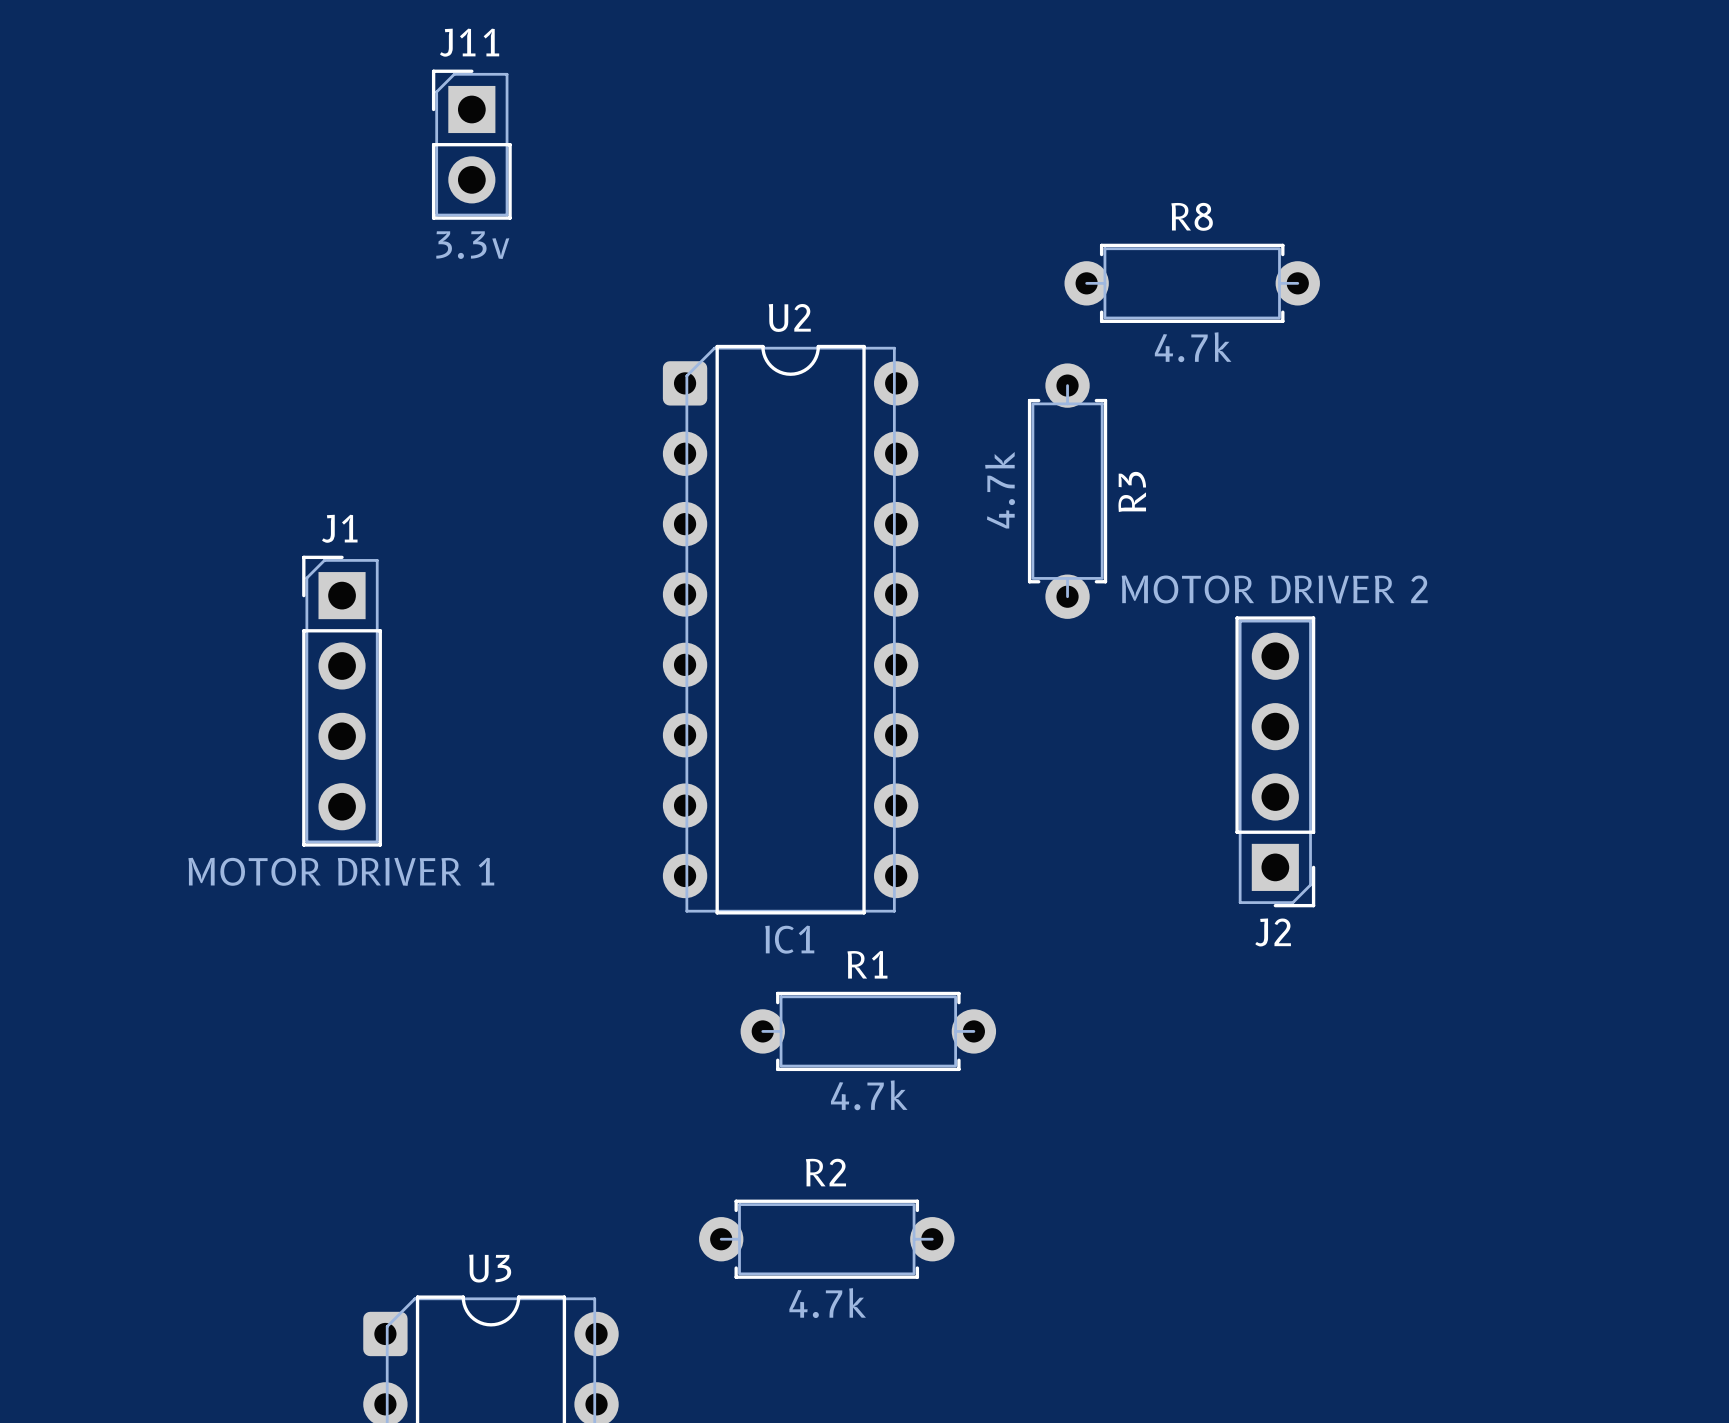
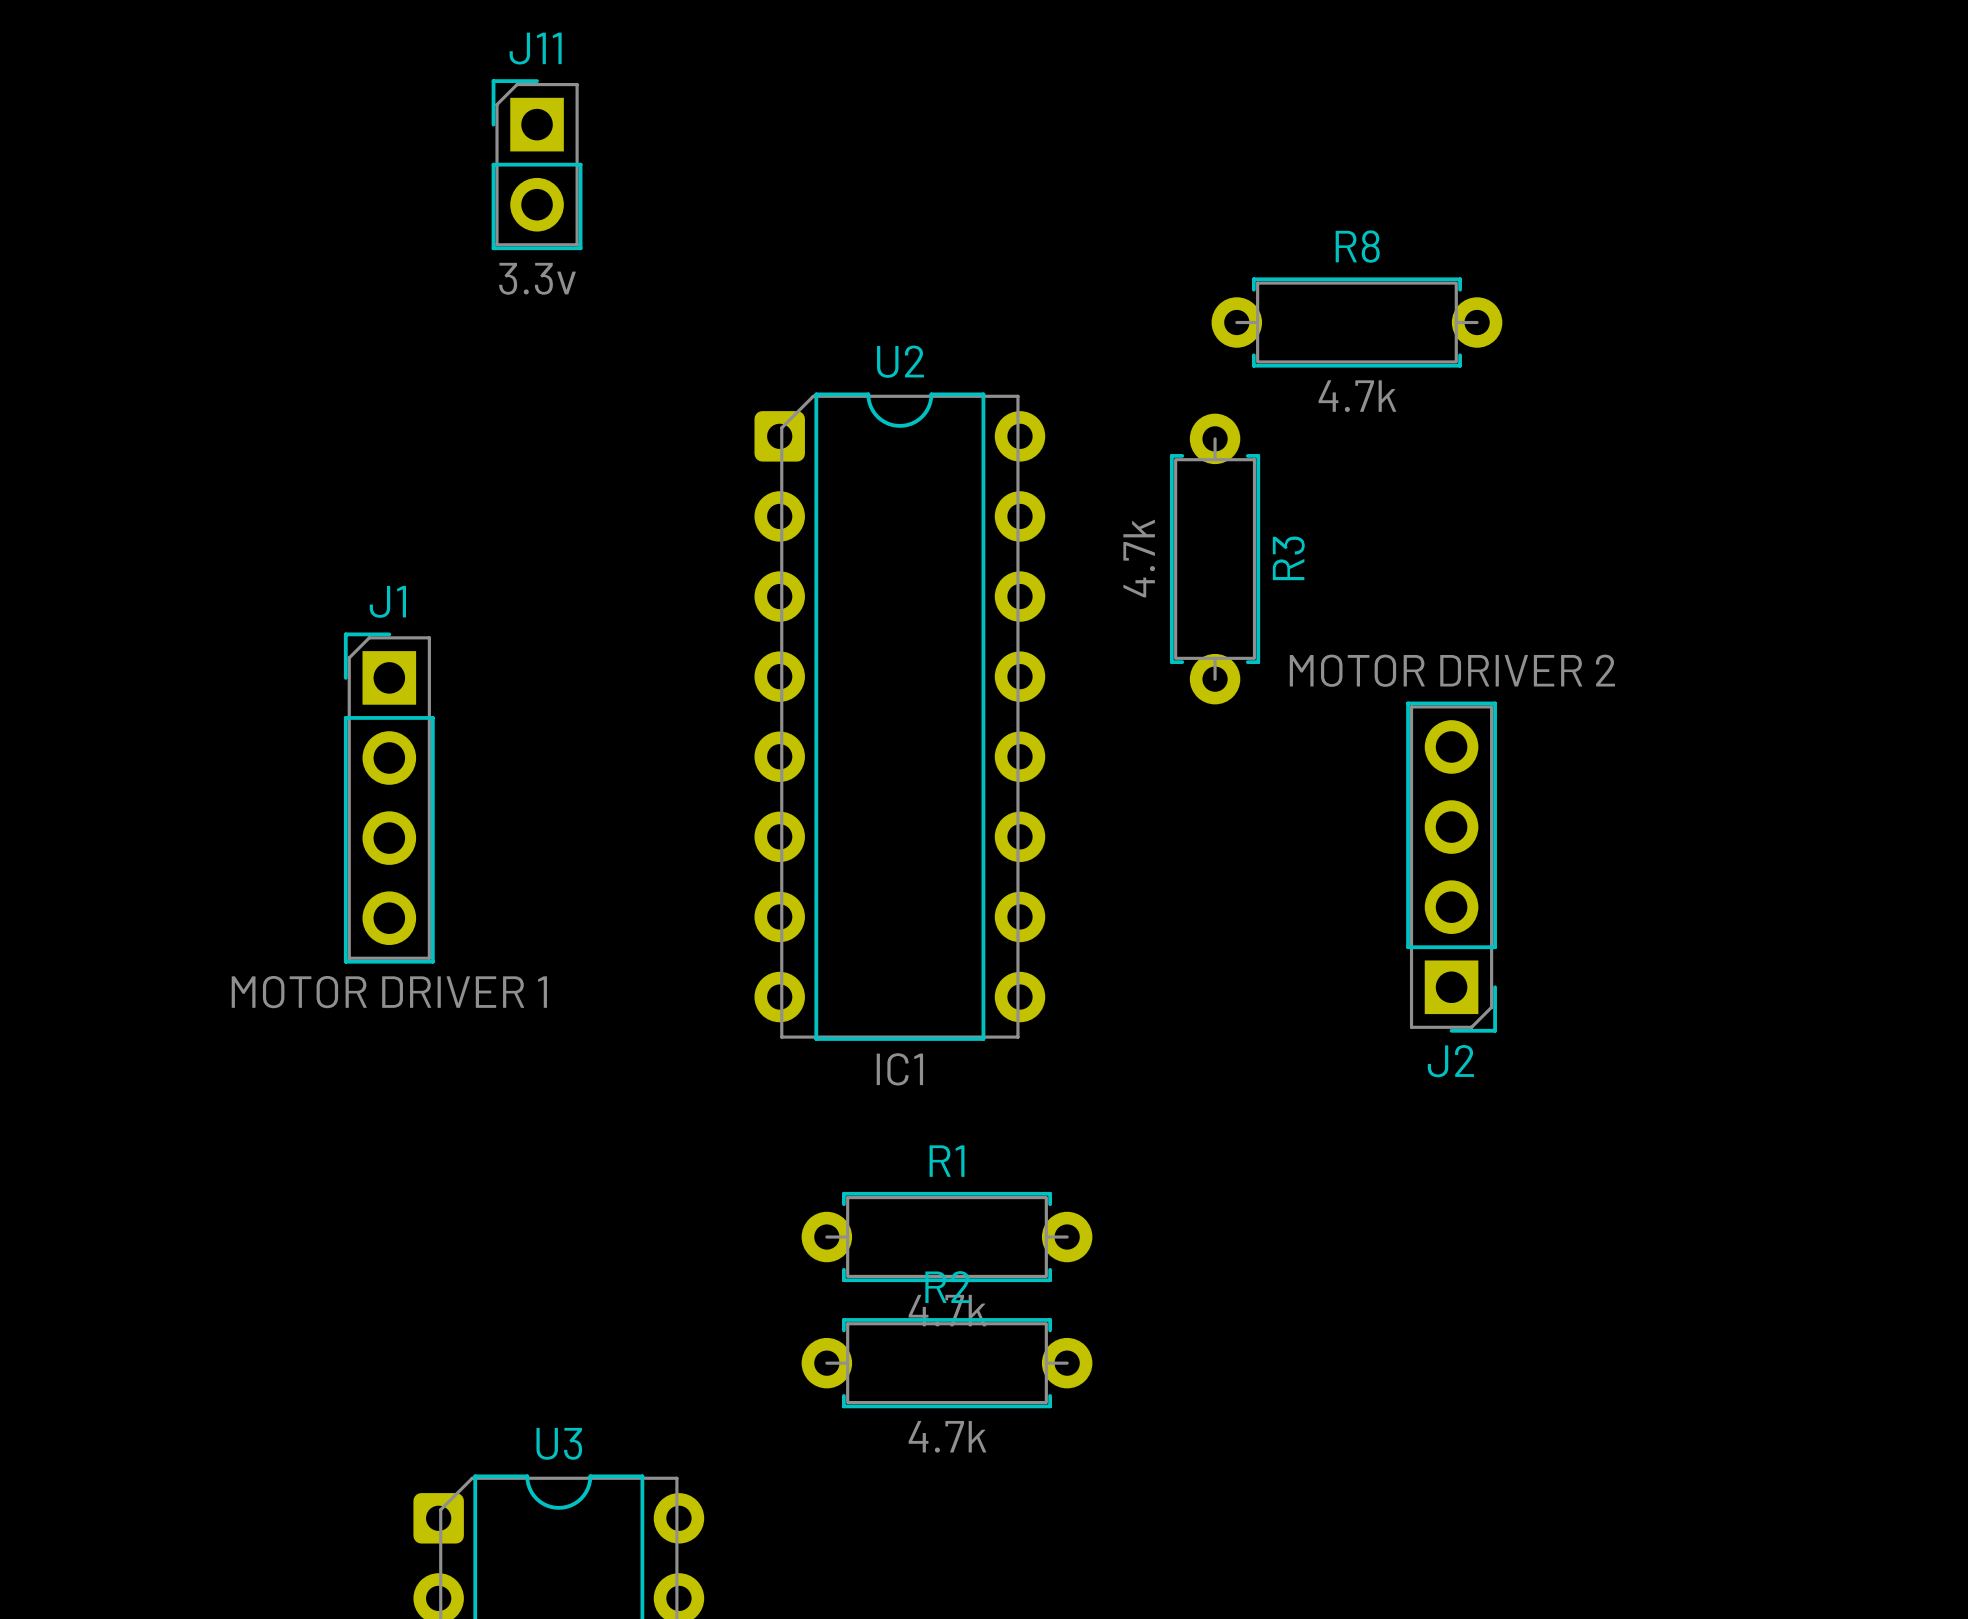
R1 position: (868, 1031) -> (947, 1237)
R2 position: (826, 1239) -> (947, 1363)

